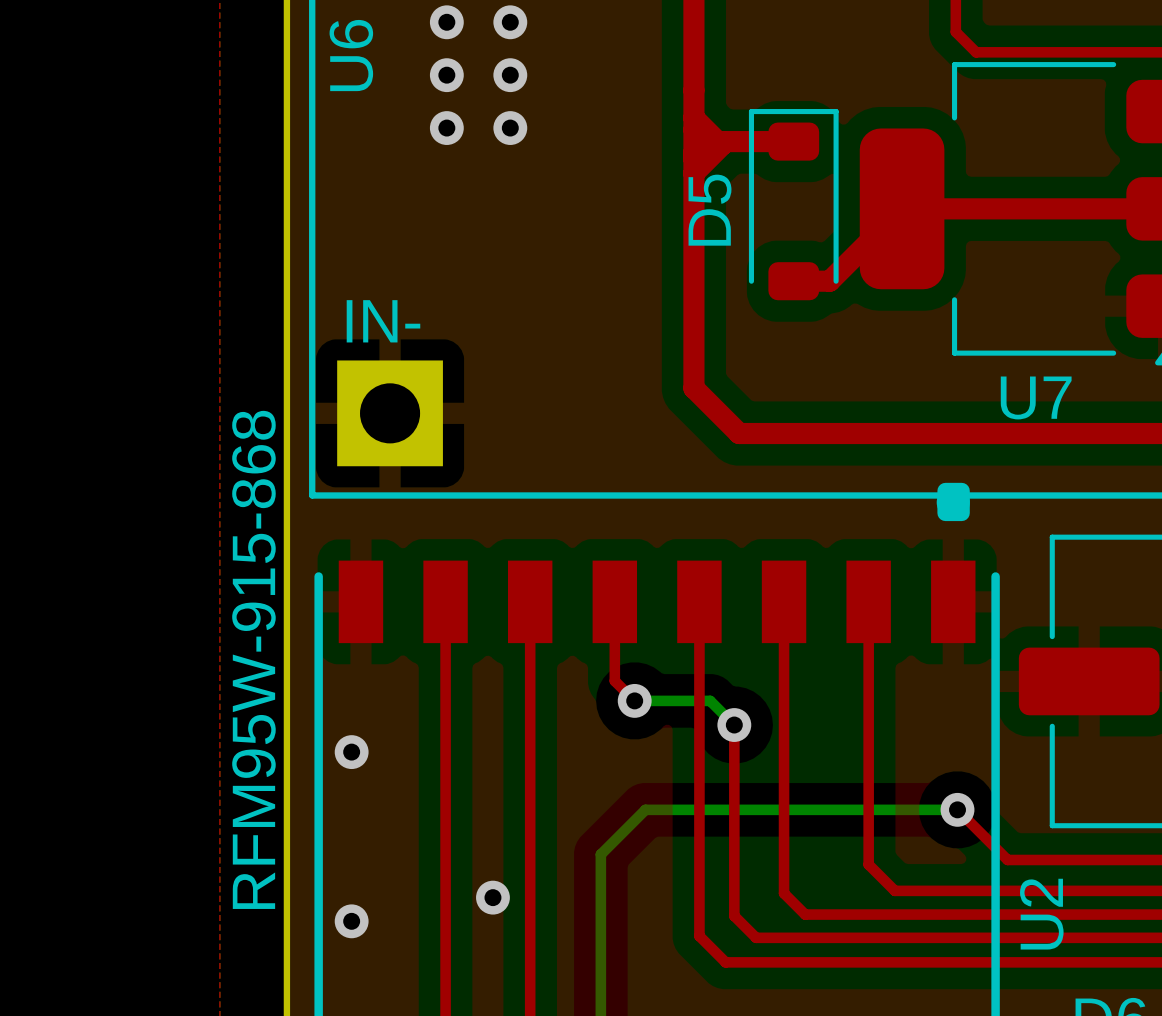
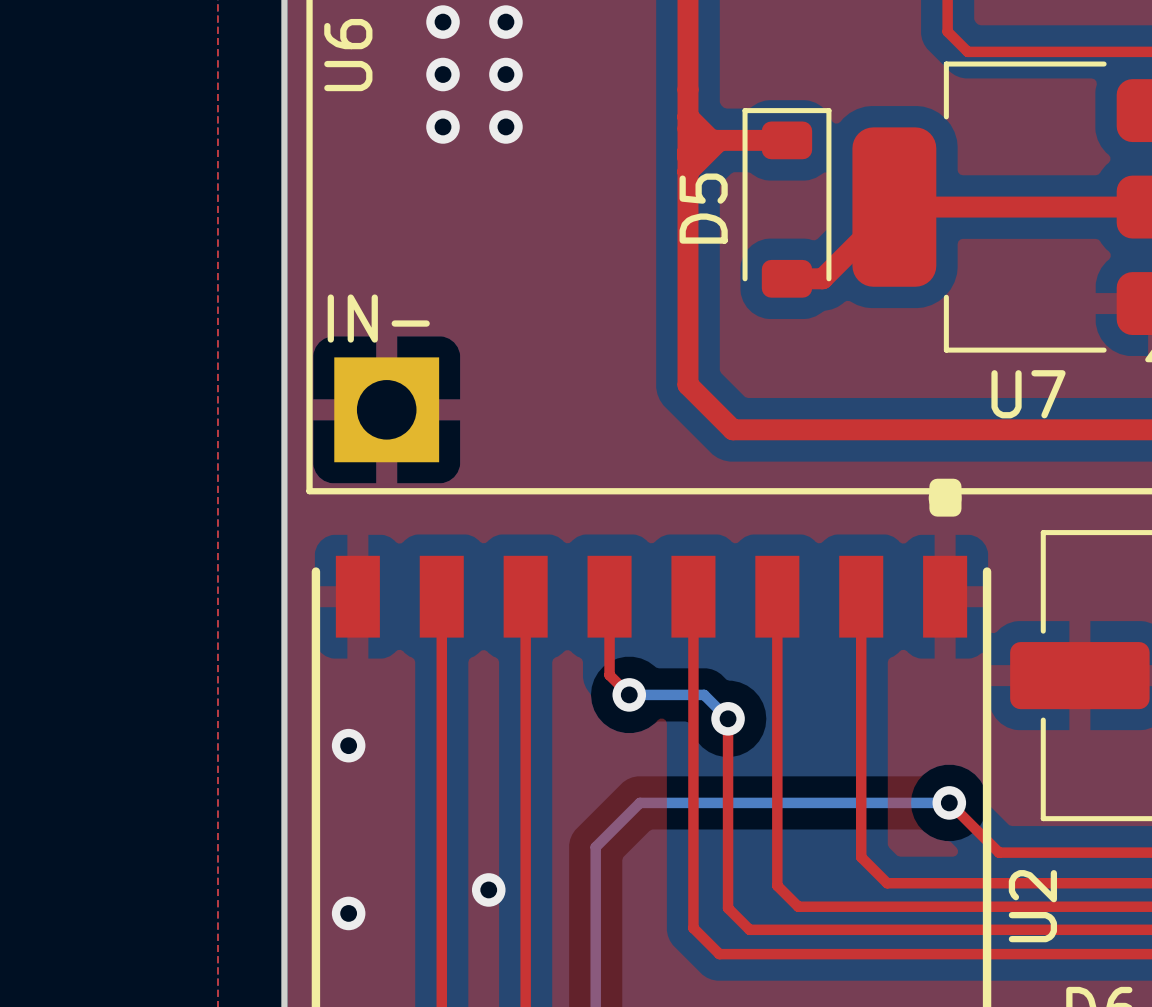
U2 value: RFM95W-915-868 (253, 659) -> none

